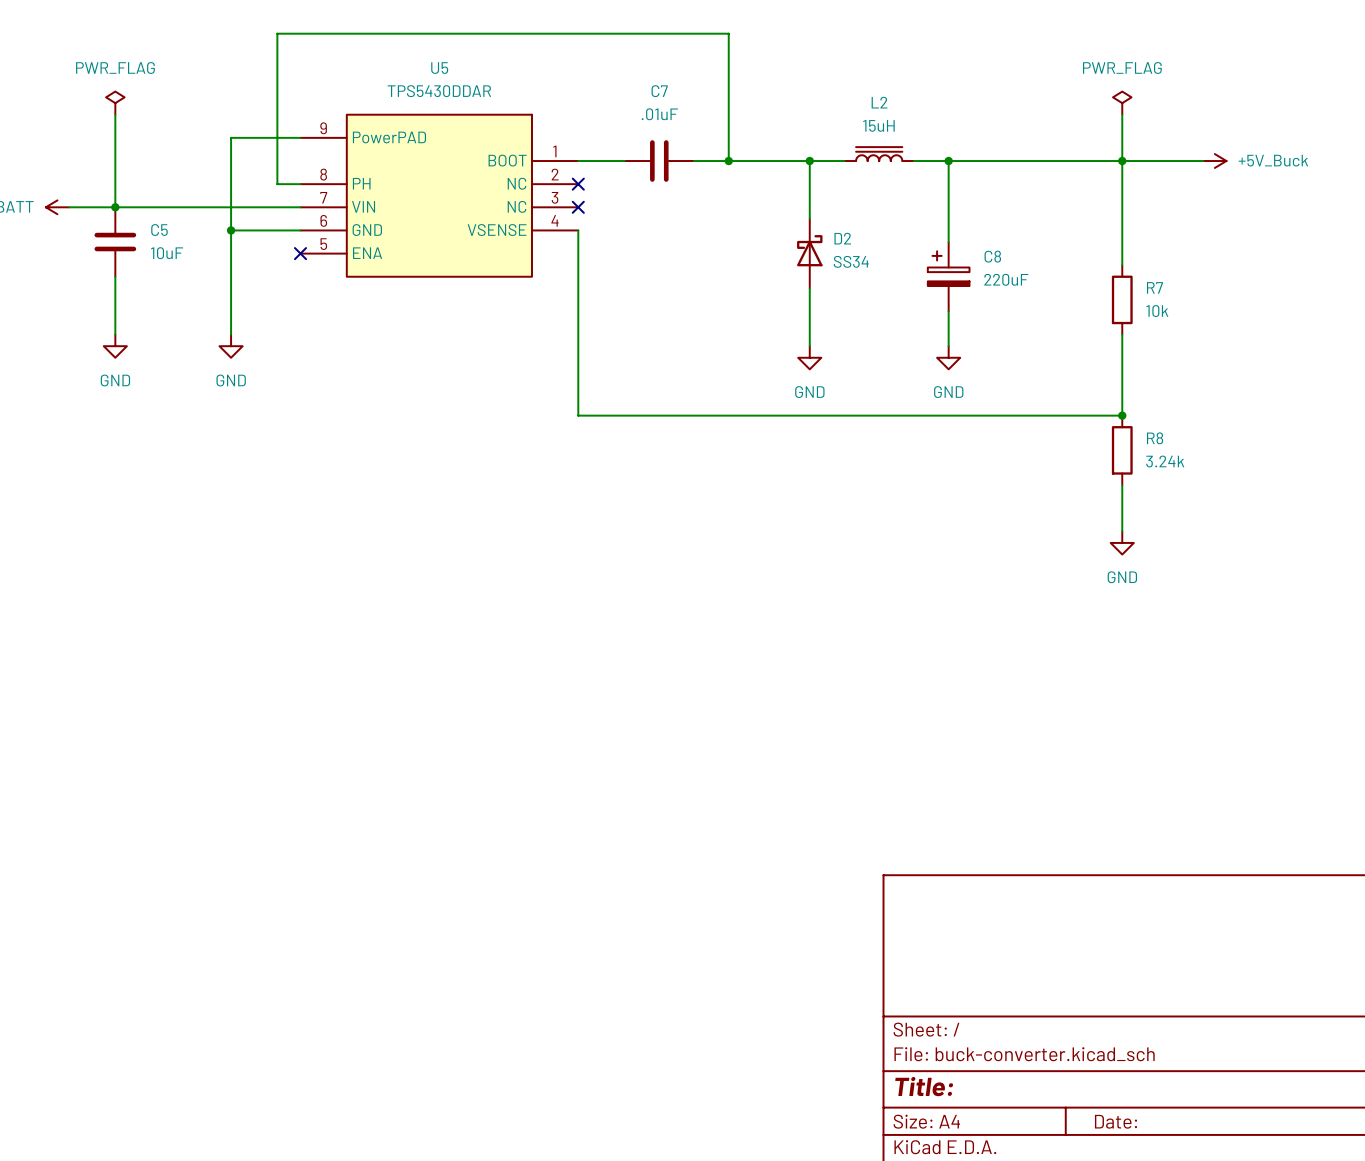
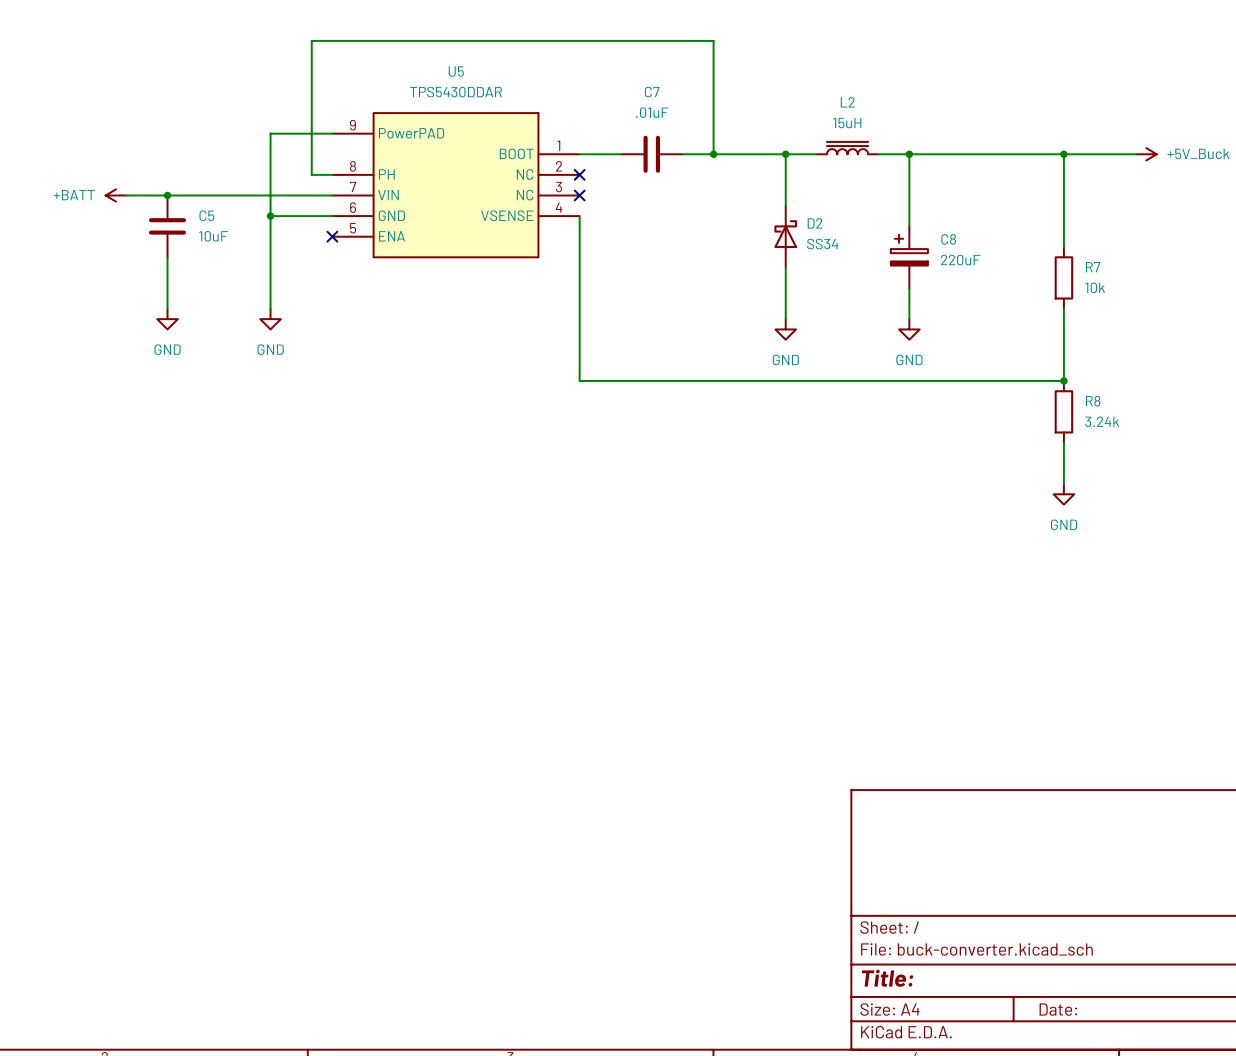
power symbol: PWR_FLAG (115, 103) -> none
power symbol: PWR_FLAG (1122, 103) -> none
wire: (115, 114) (115, 207) -> none
wire: (1122, 114) (1122, 161) -> none

